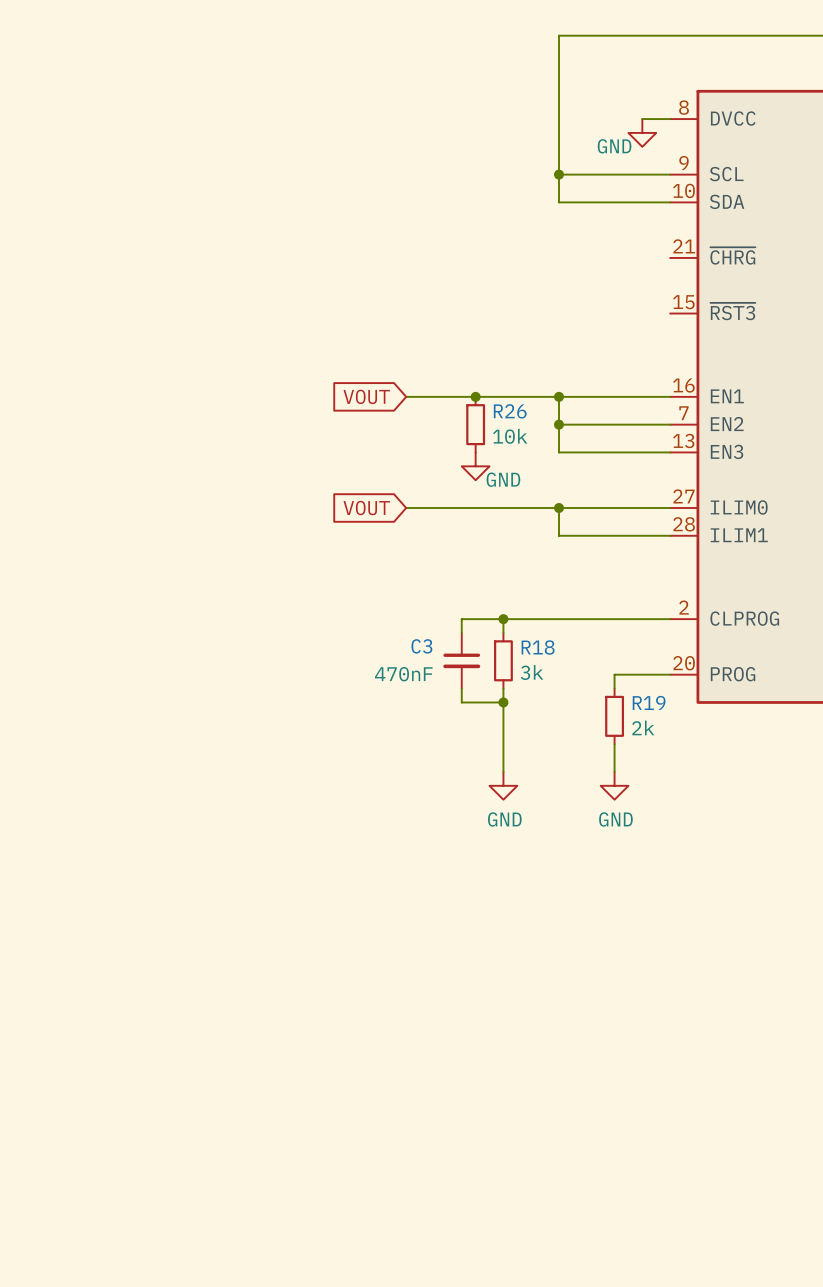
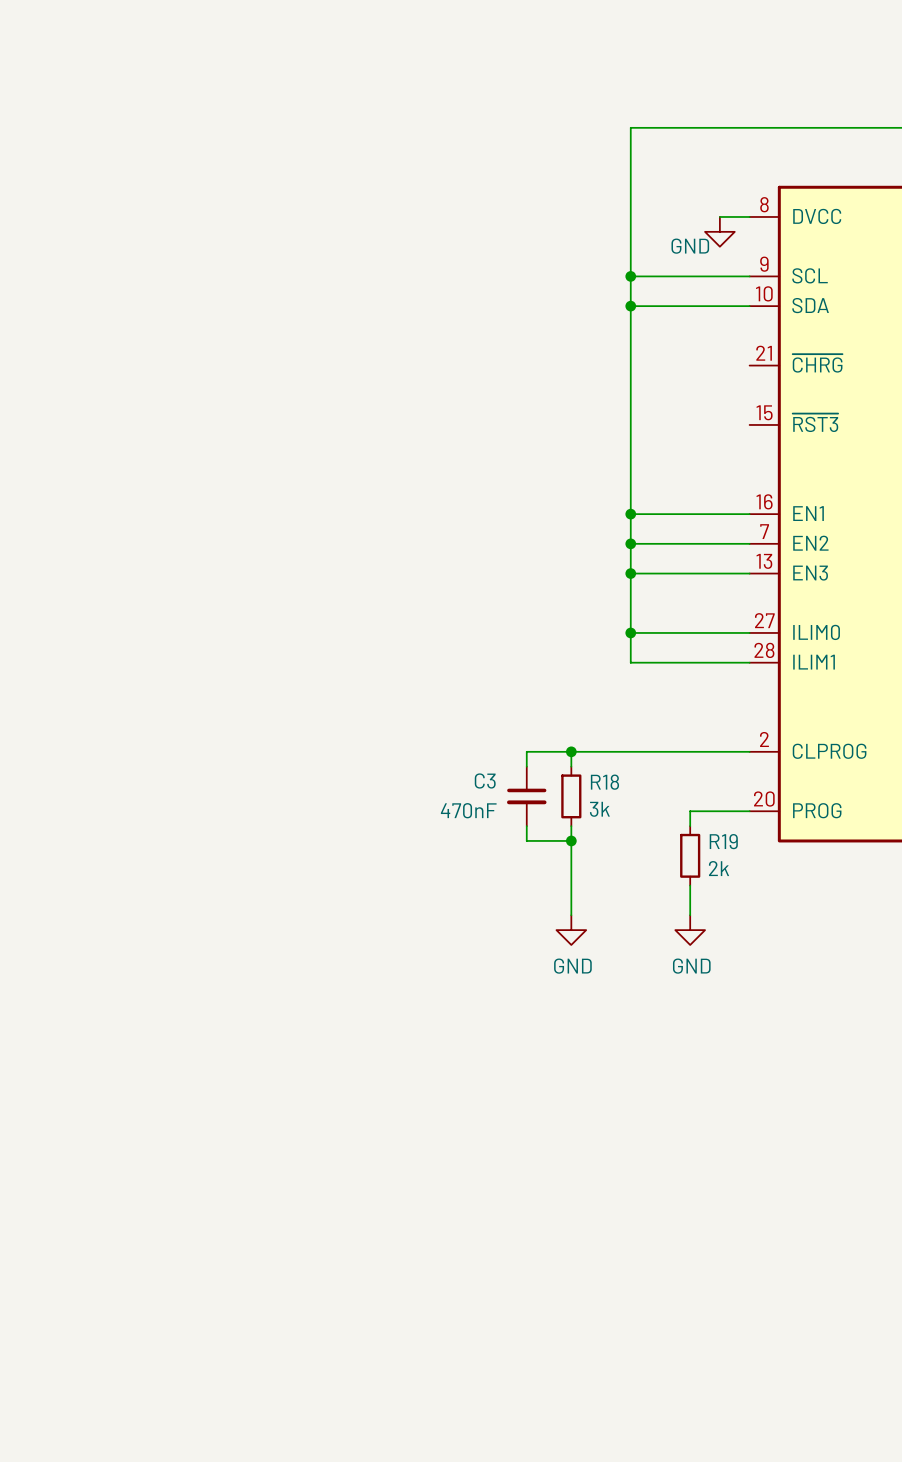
junction: none -> (630, 306)
global label: VOUT (366, 396) -> none
wire: (406, 396) (559, 396) -> (630, 306) (630, 514)
junction: (475, 396) -> none
R26: 10k (475, 424) -> none
junction: none -> (630, 573)
power symbol: GND (475, 466) -> none
global label: VOUT (366, 508) -> none
wire: (406, 508) (559, 508) -> (630, 573) (630, 632)

